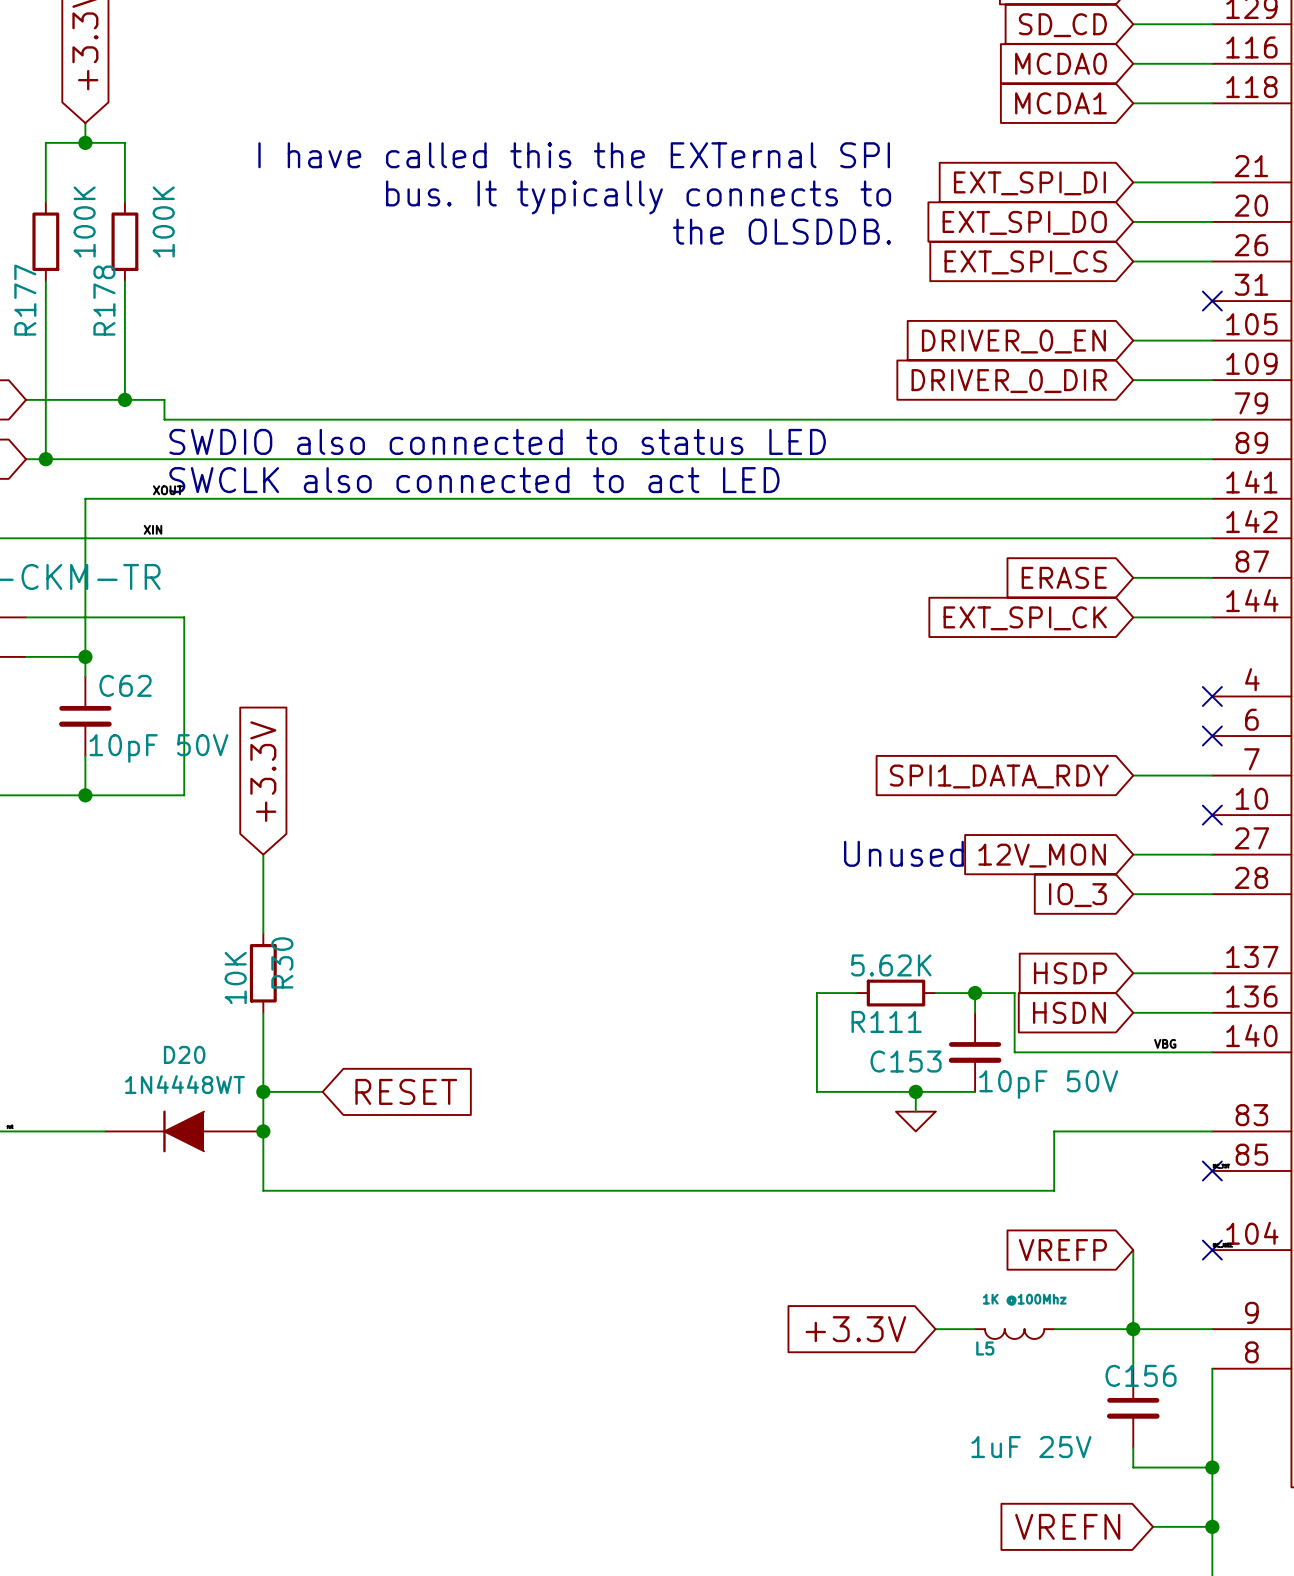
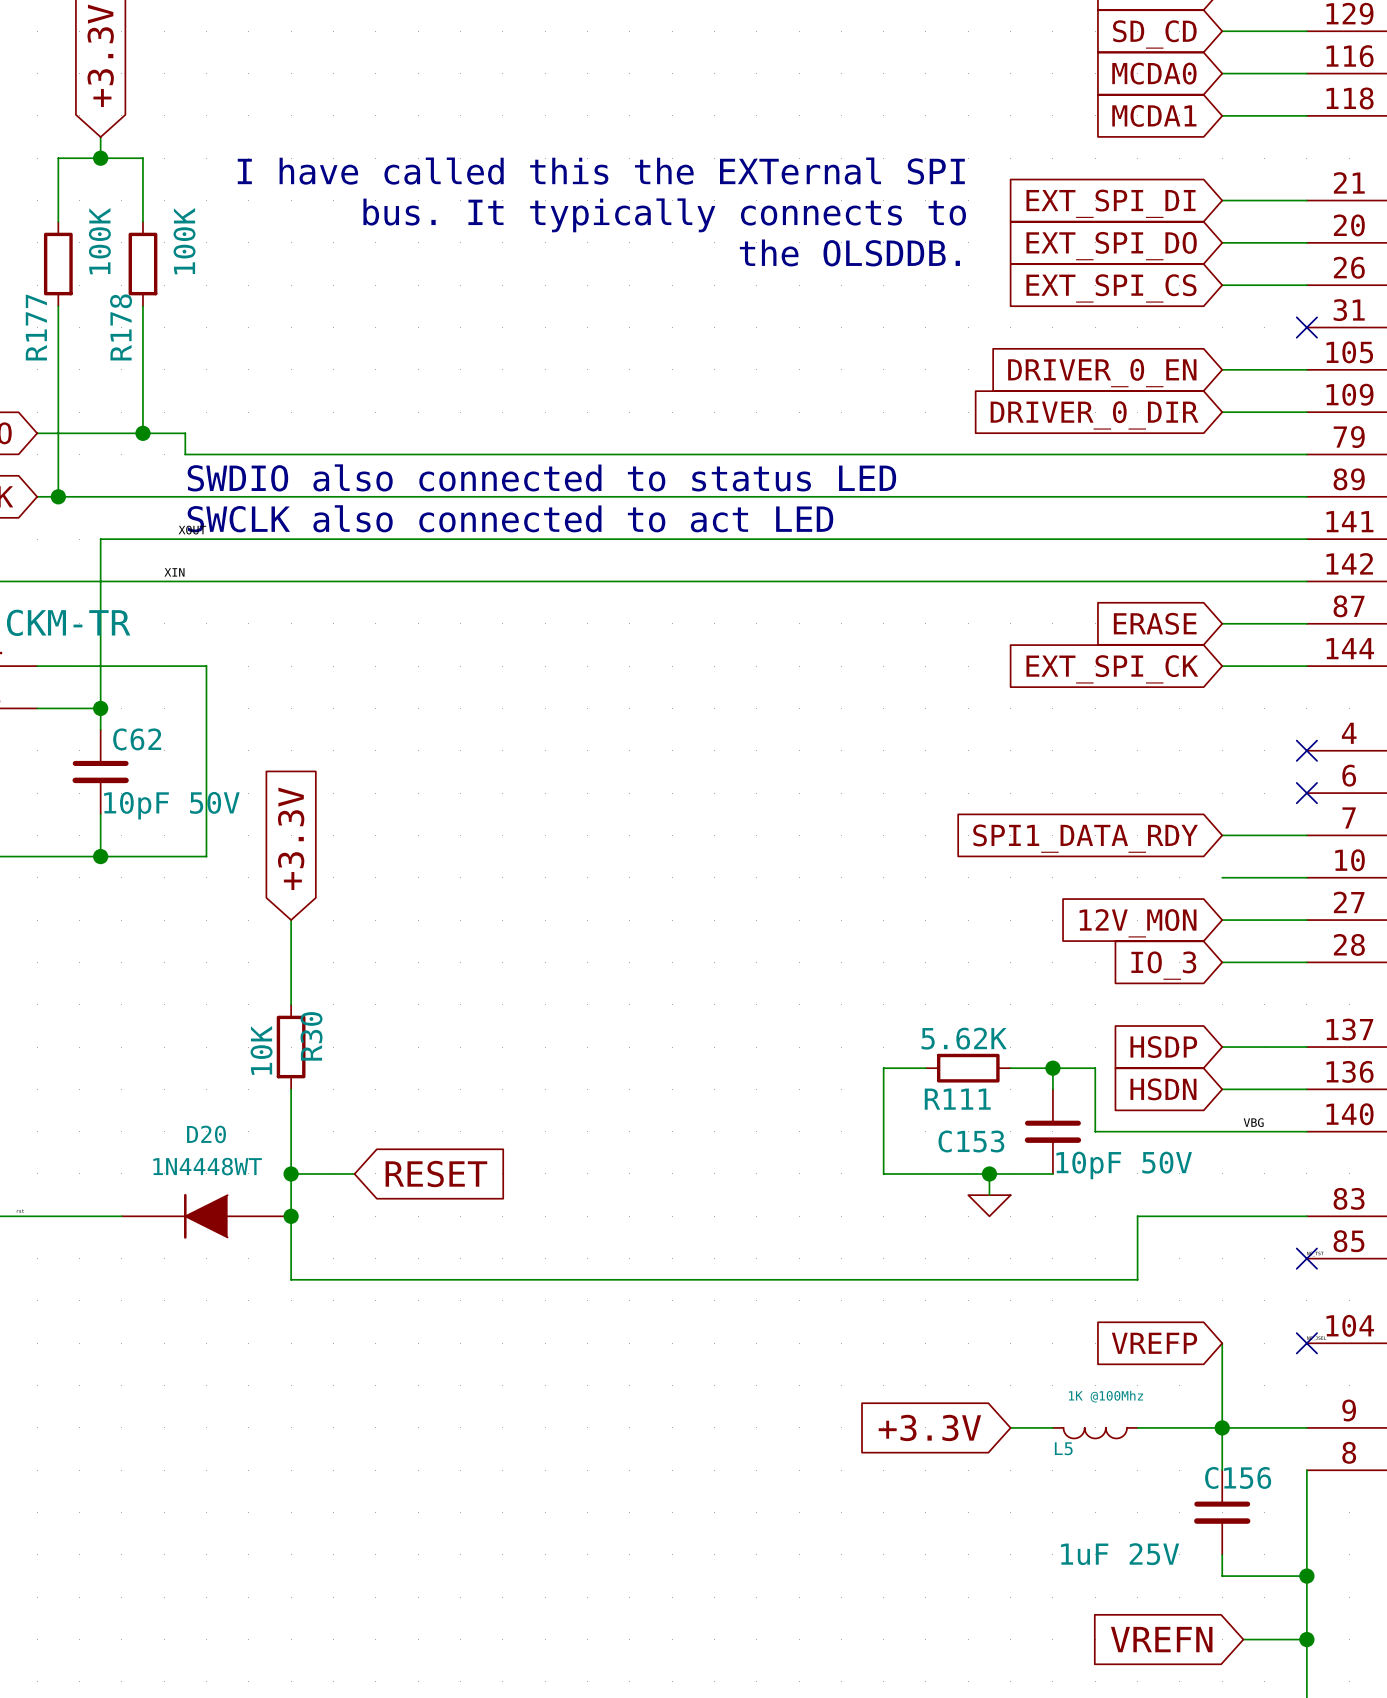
wire: none -> (1222, 877) (1306, 877)
no-connect mark: (1212, 815) -> none
text: Unused (903, 853) -> none

